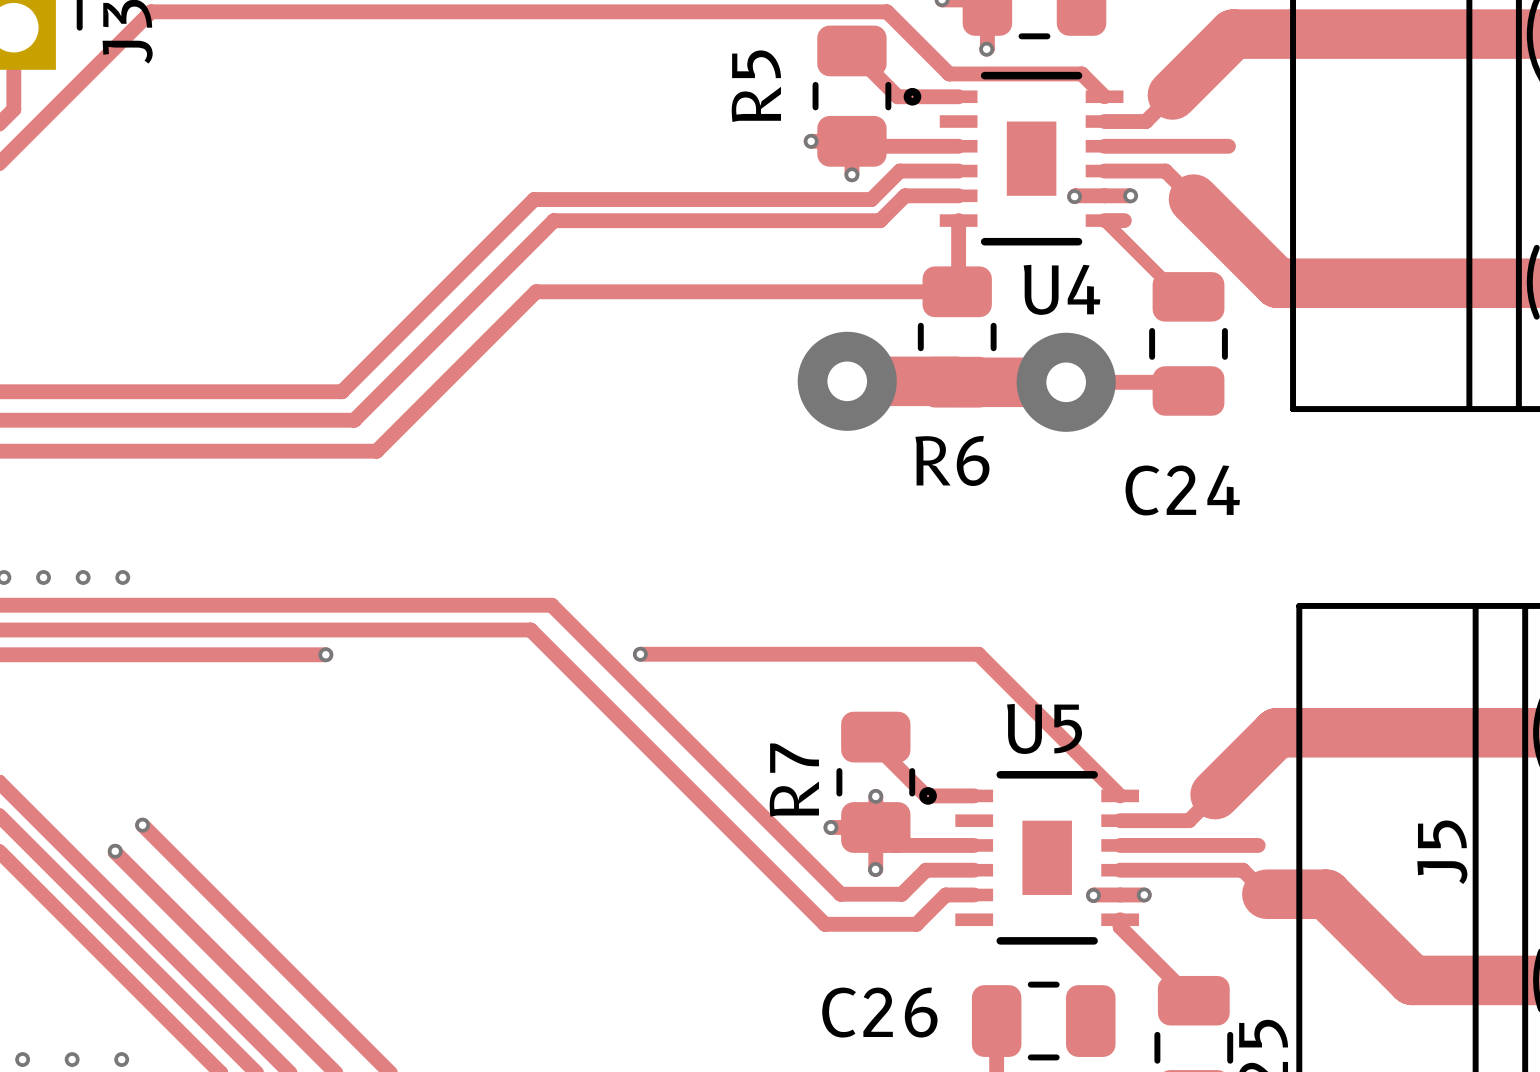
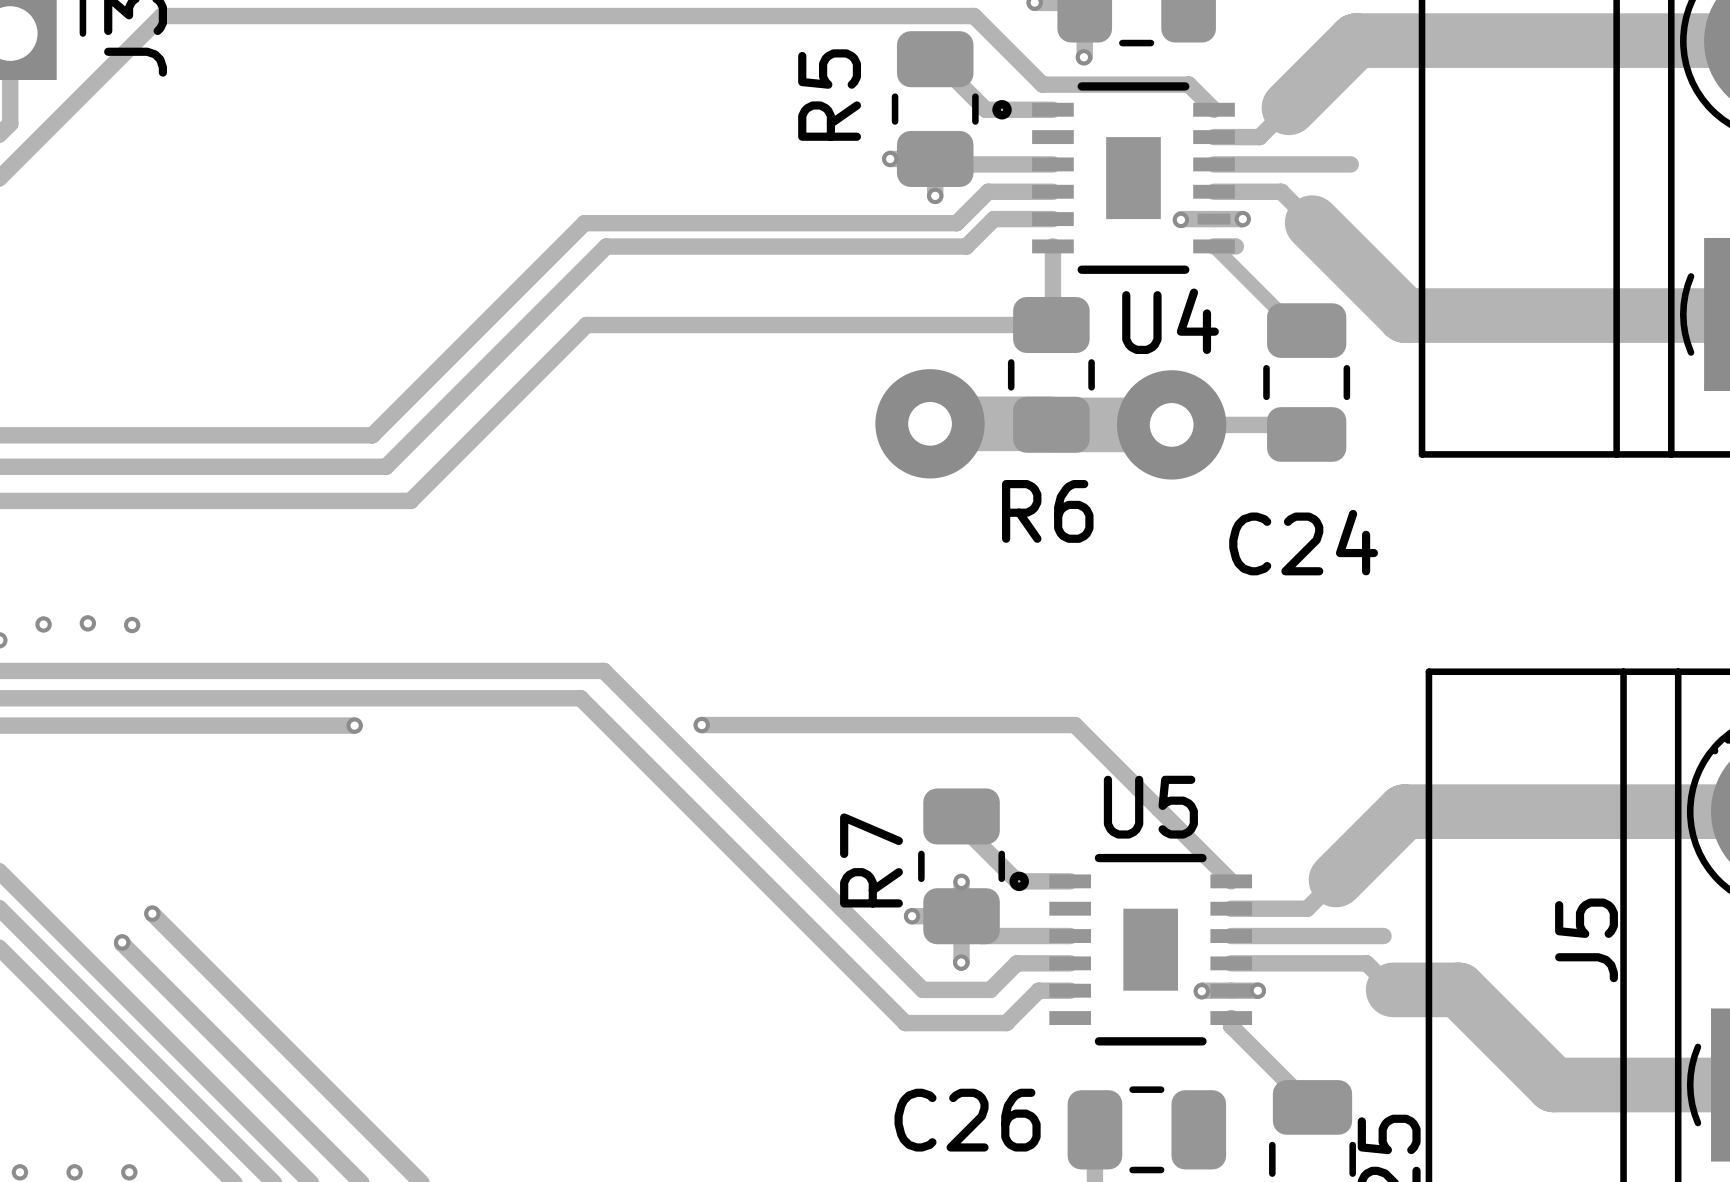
via position: (43, 577) -> (43, 624)
via position: (83, 577) -> (87, 623)
via position: (122, 577) -> (132, 625)

